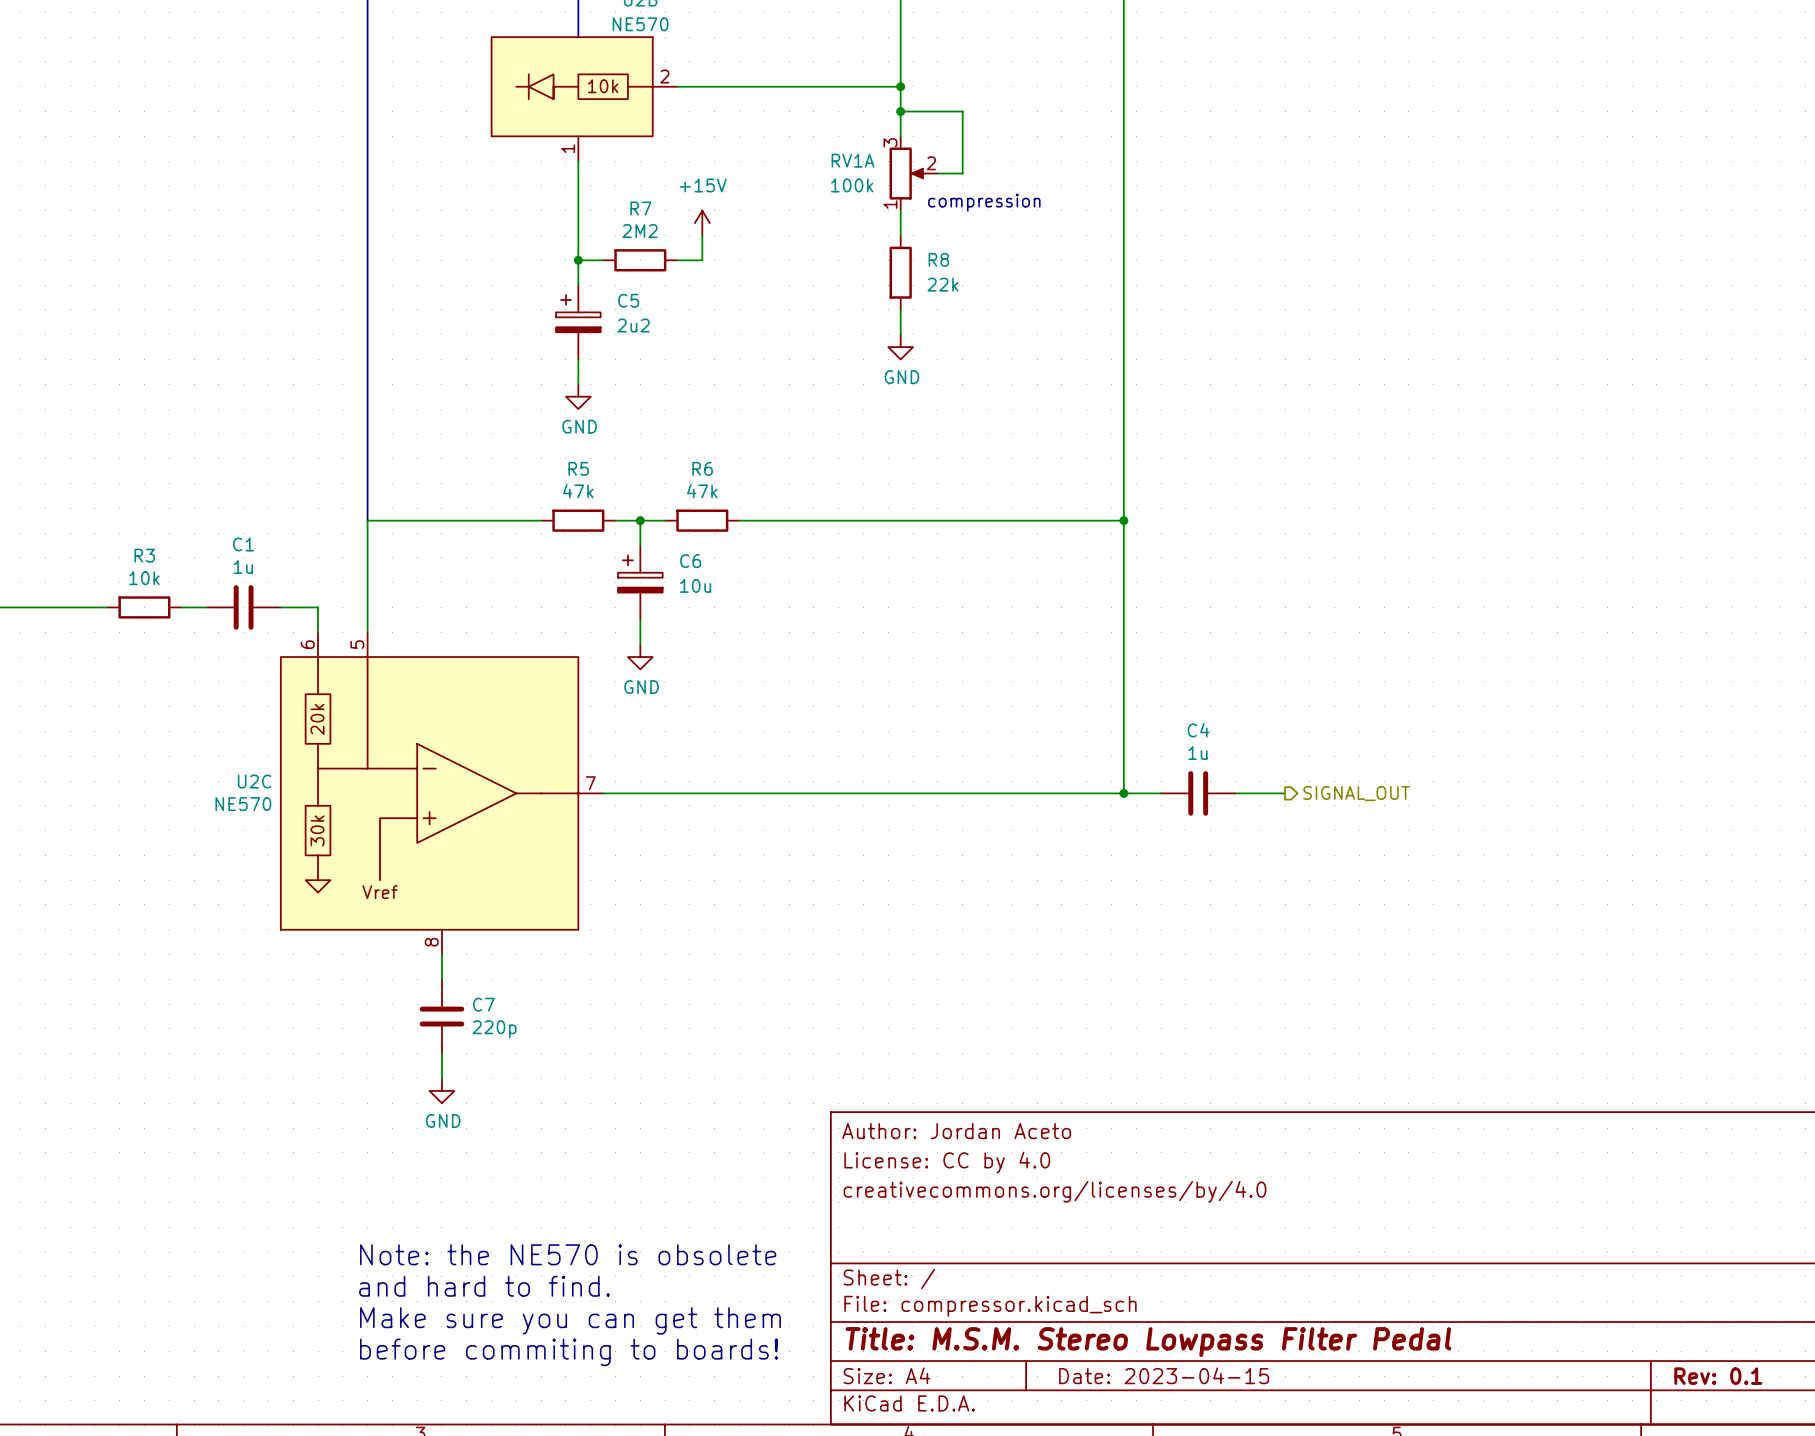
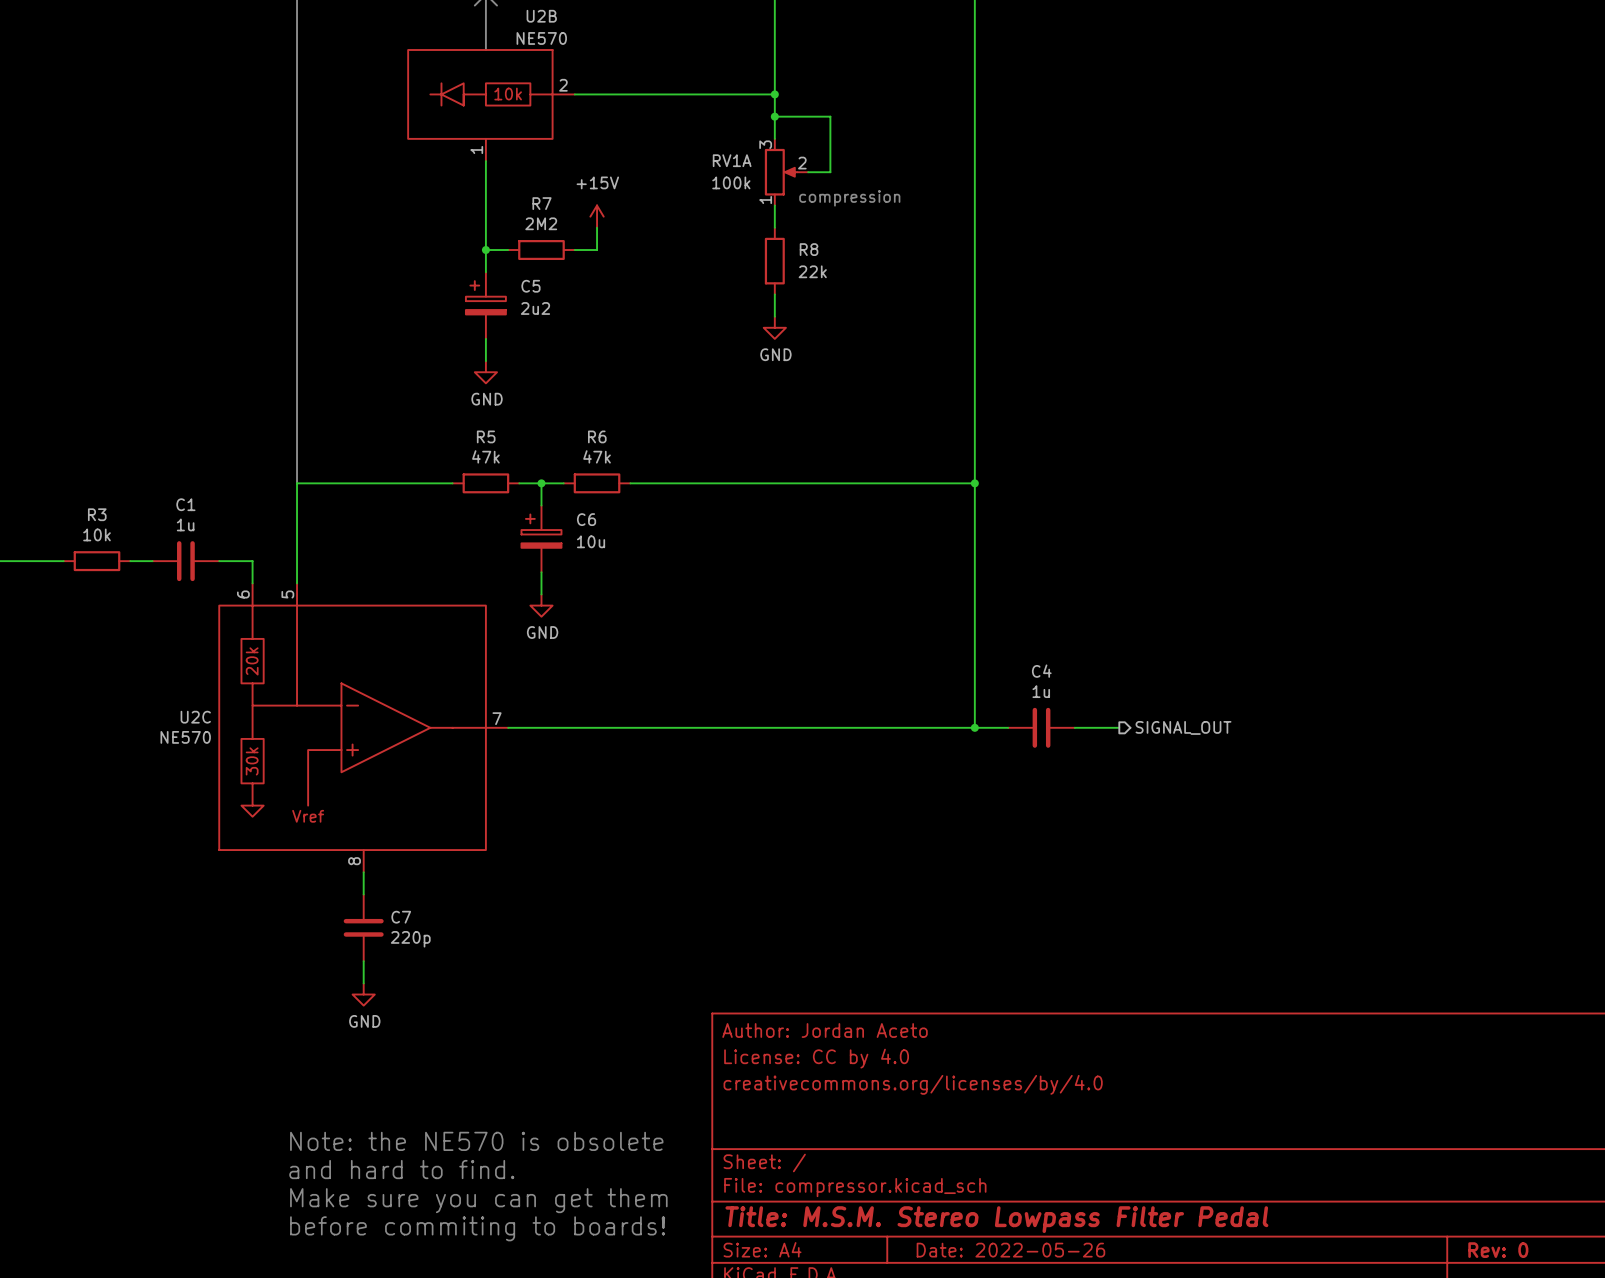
title block: Date: 2023-04-15 (1164, 1375) -> Date: 2022-05-26 (1010, 1250)
title block: Rev: 0.1 (1718, 1376) -> Rev: 0 (1498, 1250)

